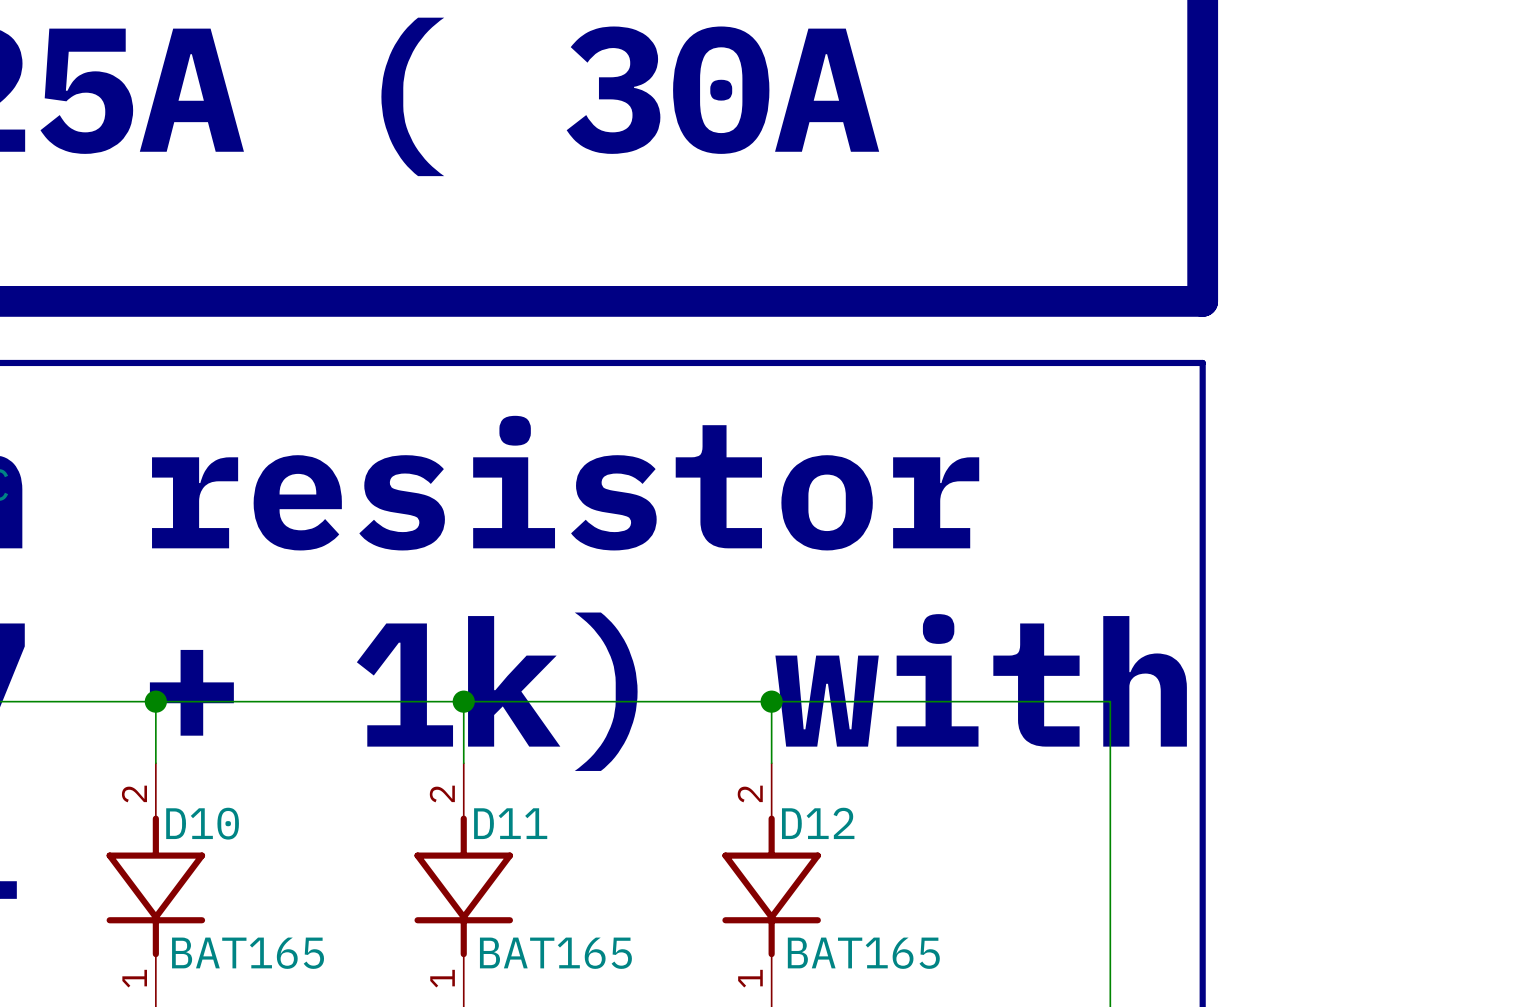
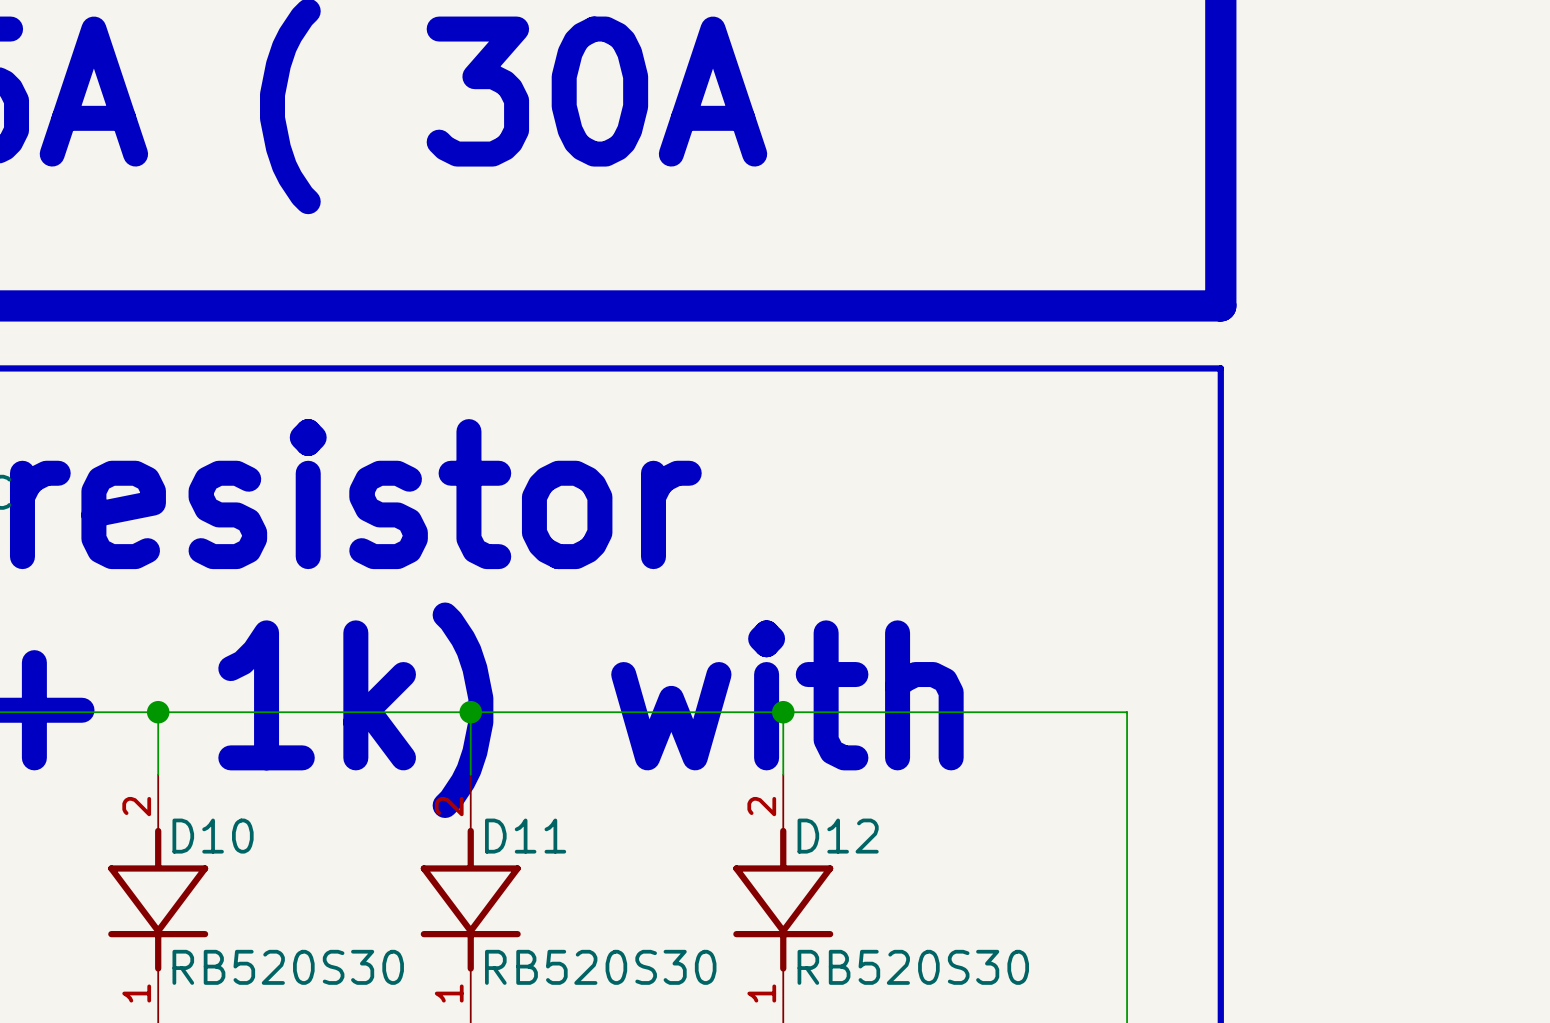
D10 value: BAT165 (248, 953) -> RB520S30 (288, 967)
D11 value: BAT165 (555, 953) -> RB520S30 (600, 967)
D12 value: BAT165 (863, 953) -> RB520S30 (913, 967)

